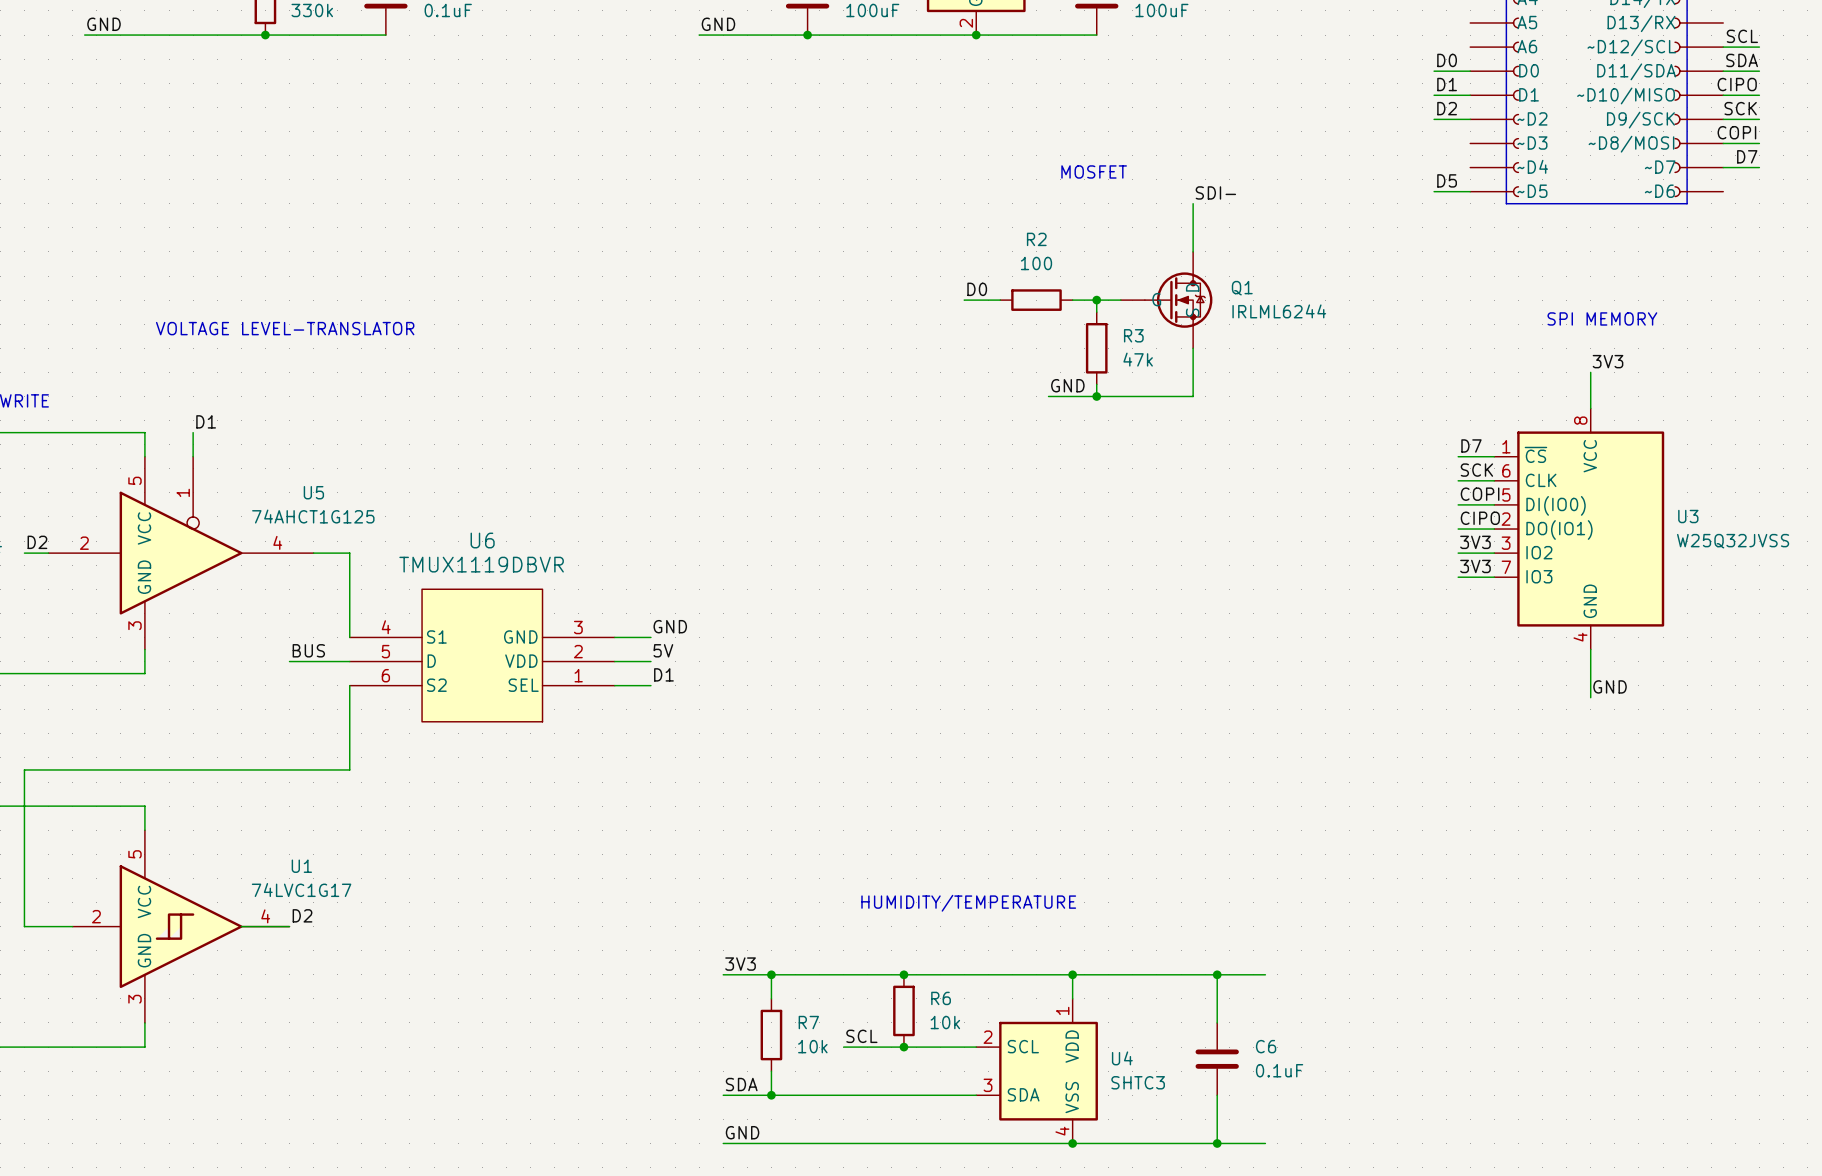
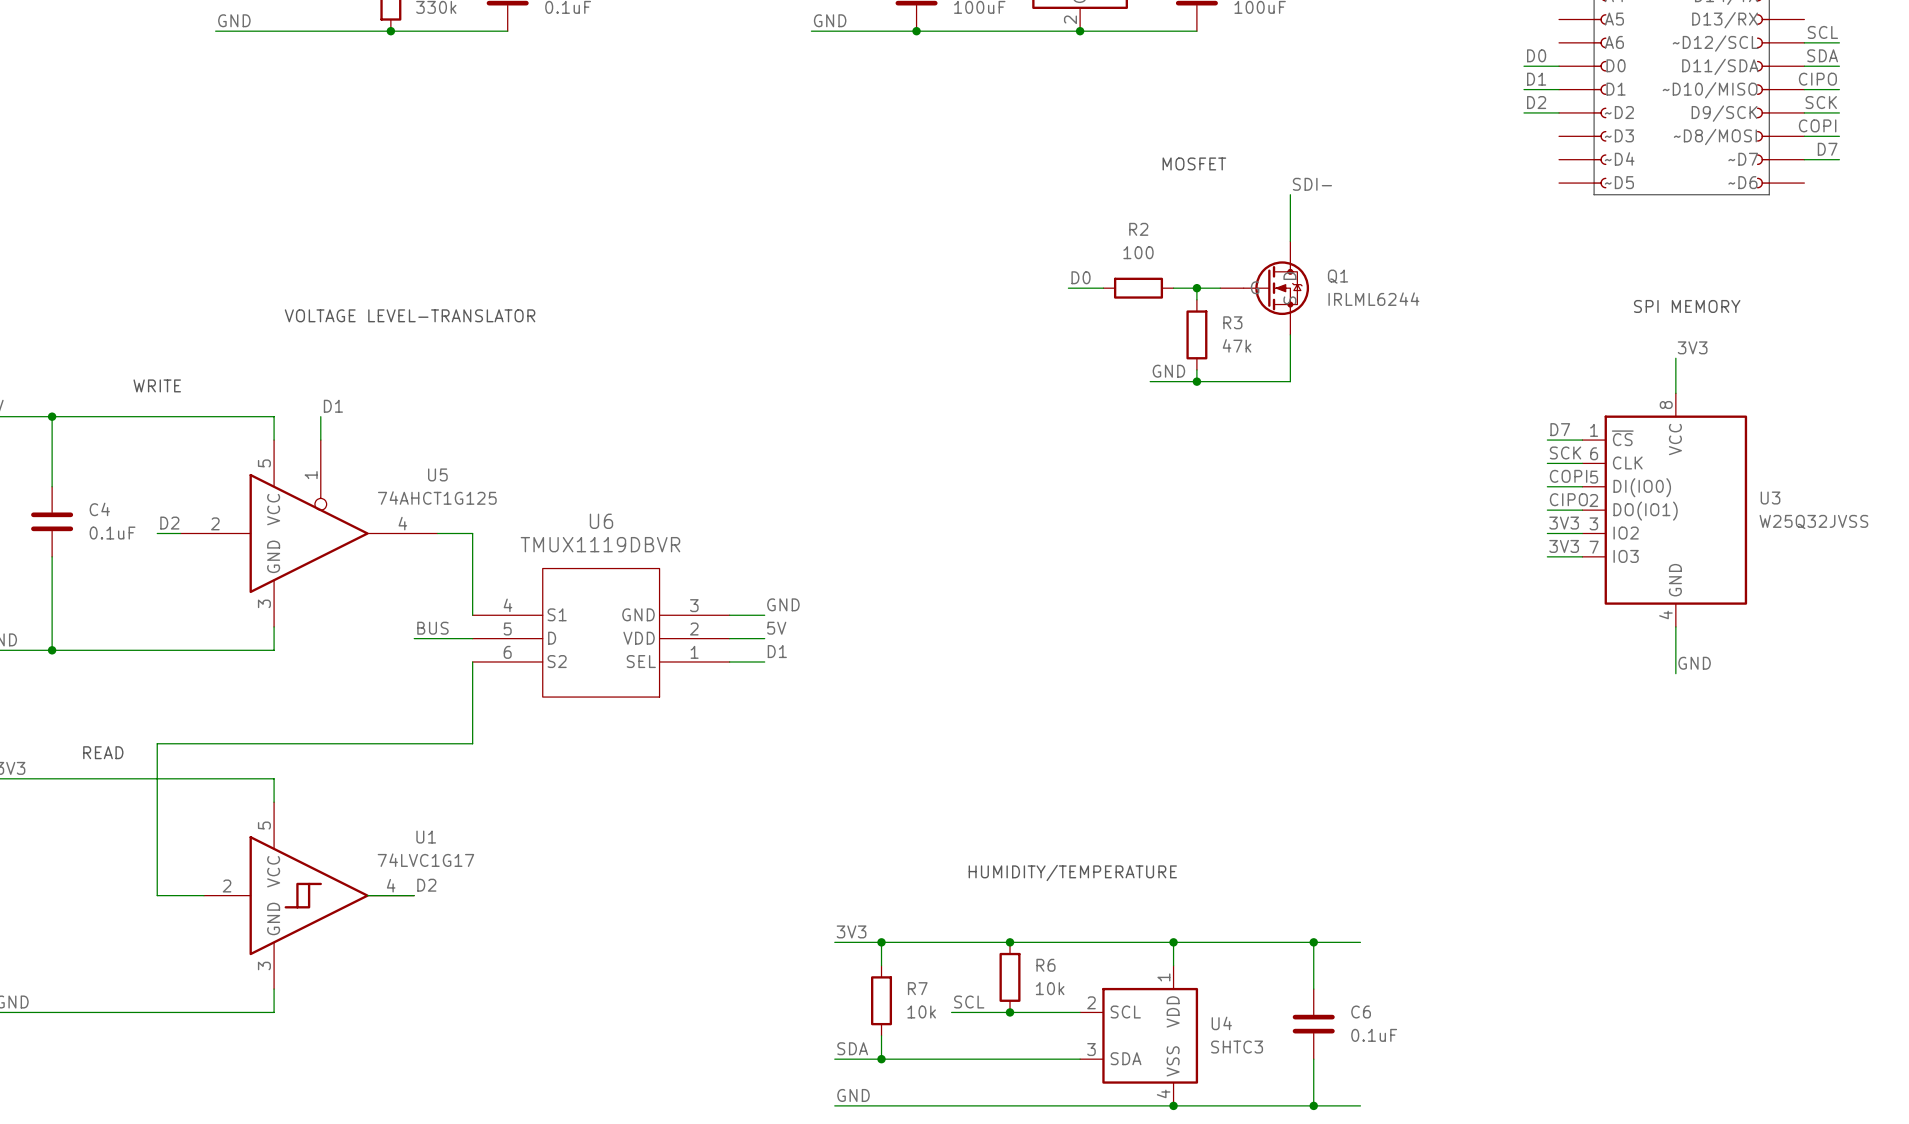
label: D5 (1447, 180) -> none
wire: (1434, 191) (1470, 191) -> none

